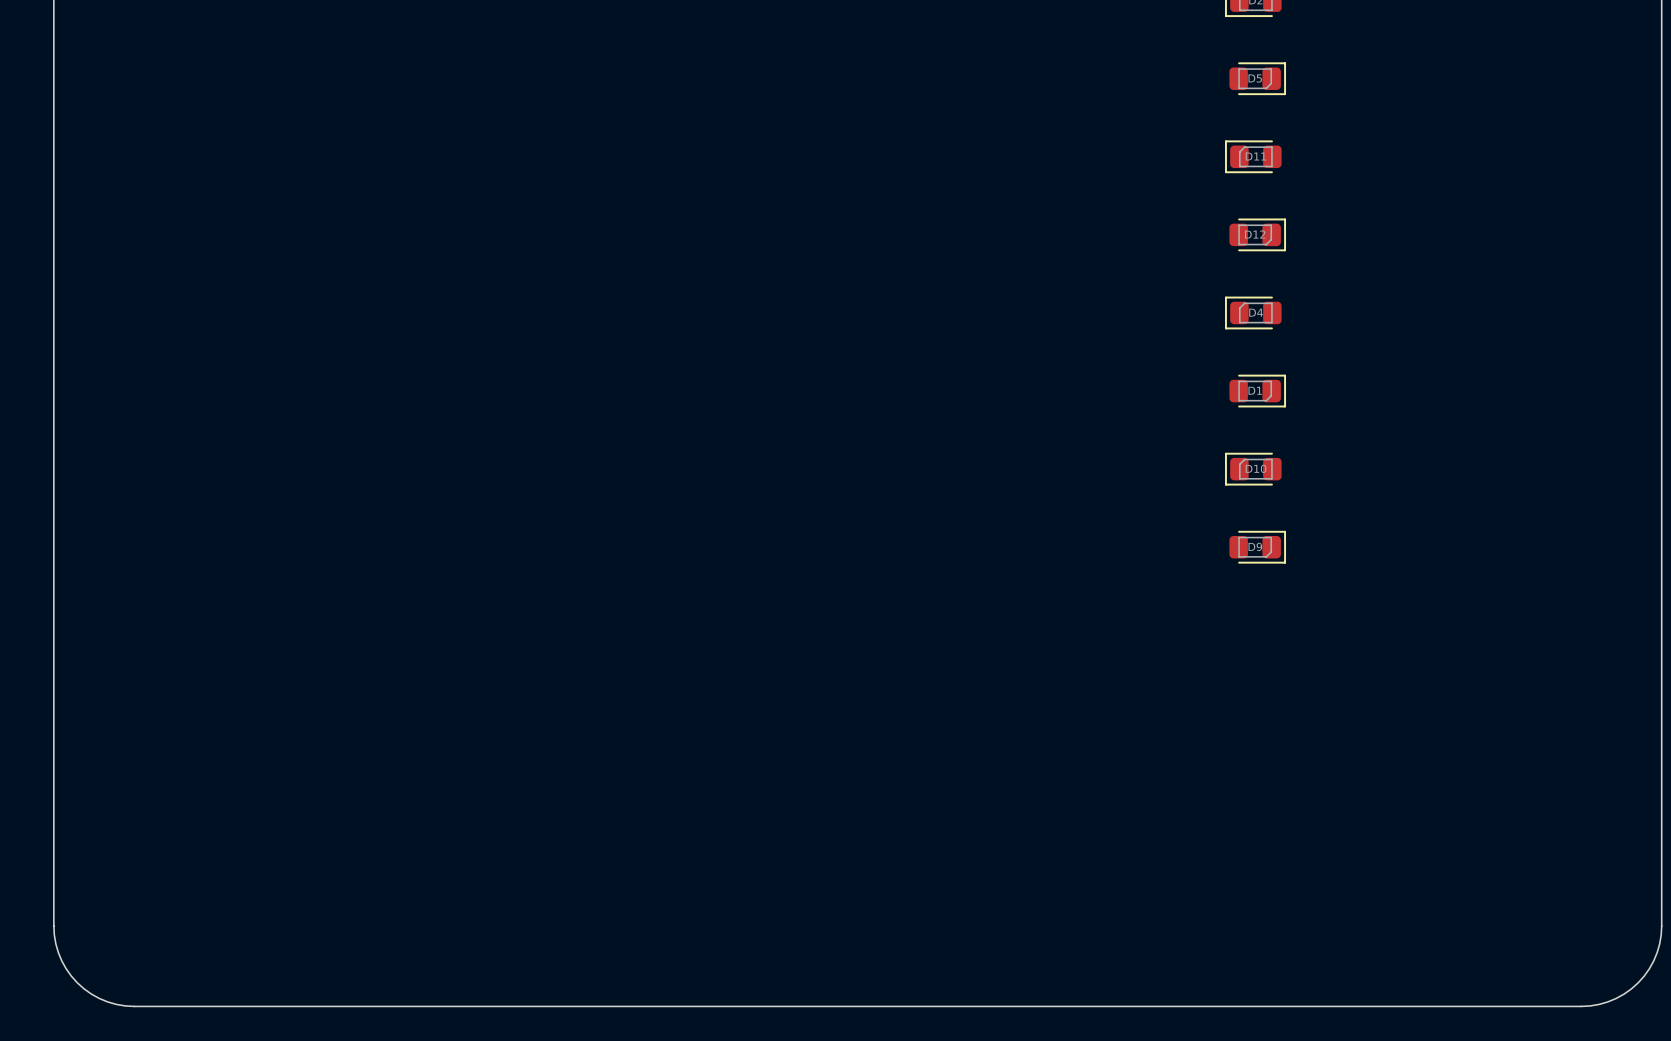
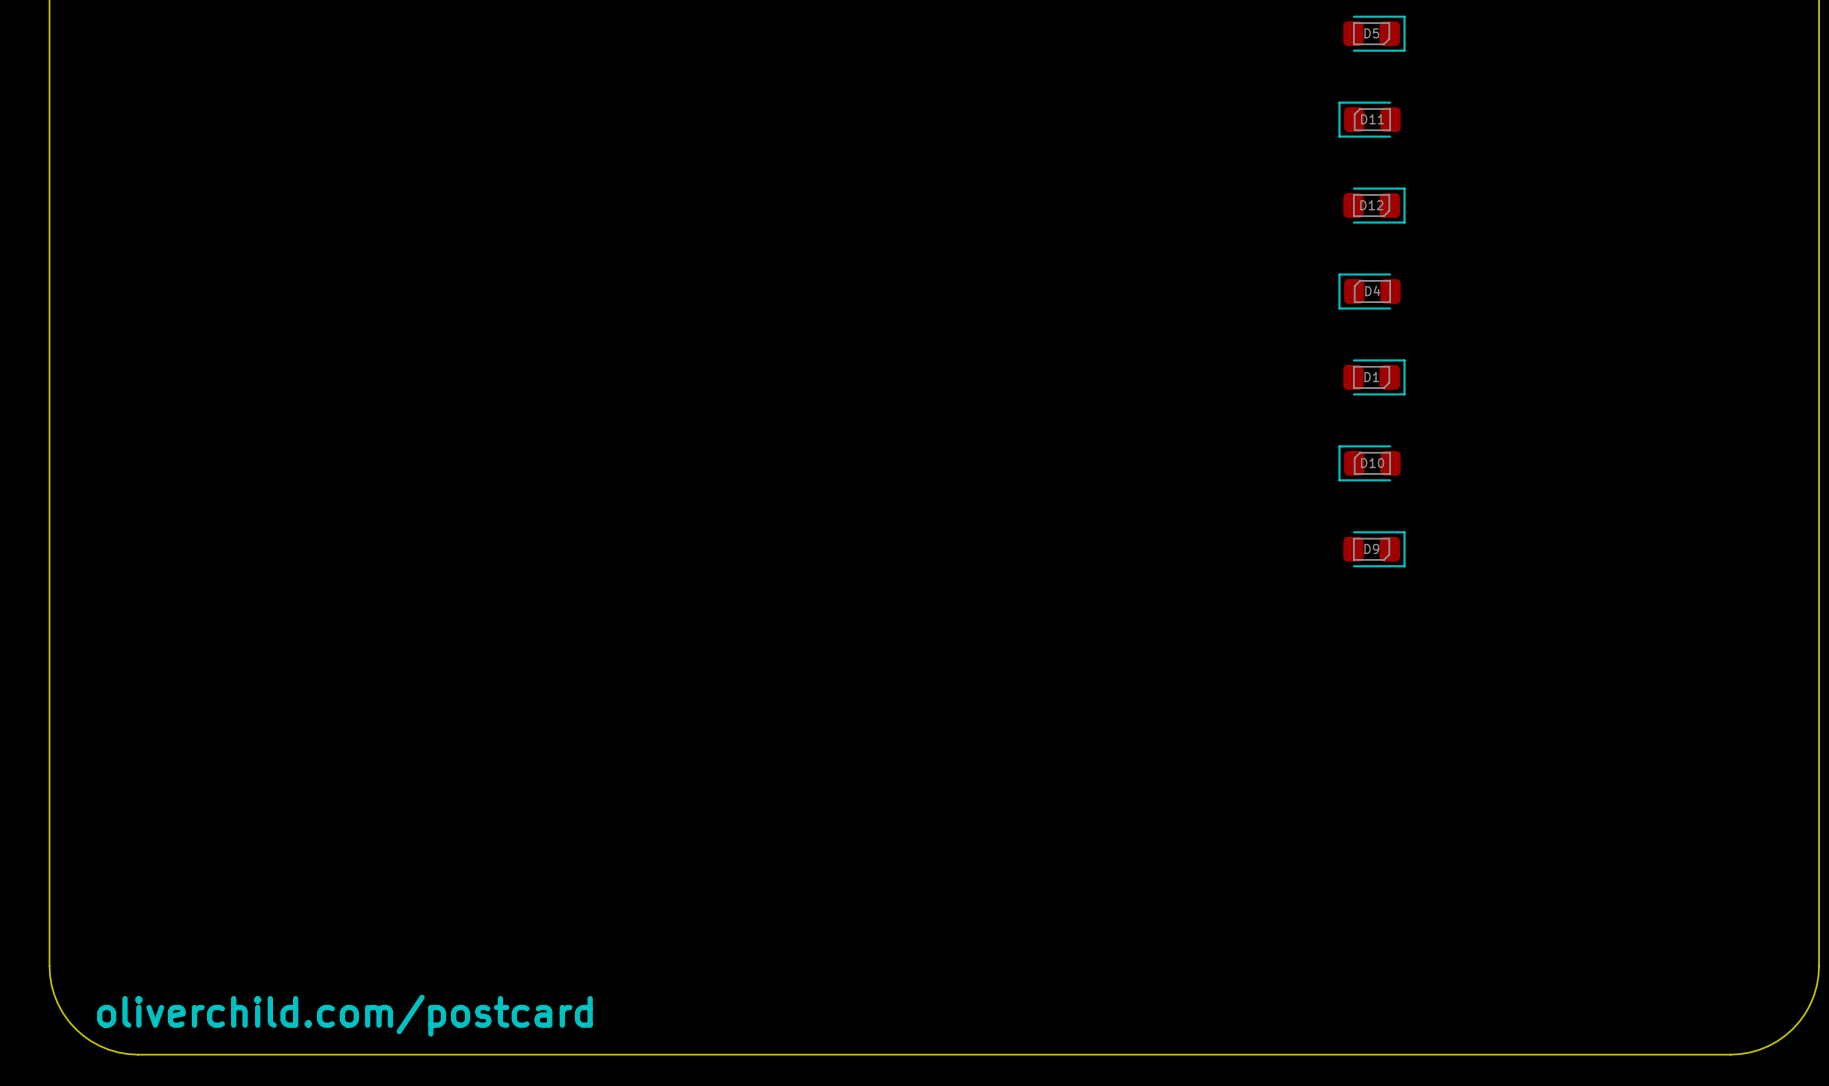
text: none -> oliverchild.com/postcard (344, 1015)

